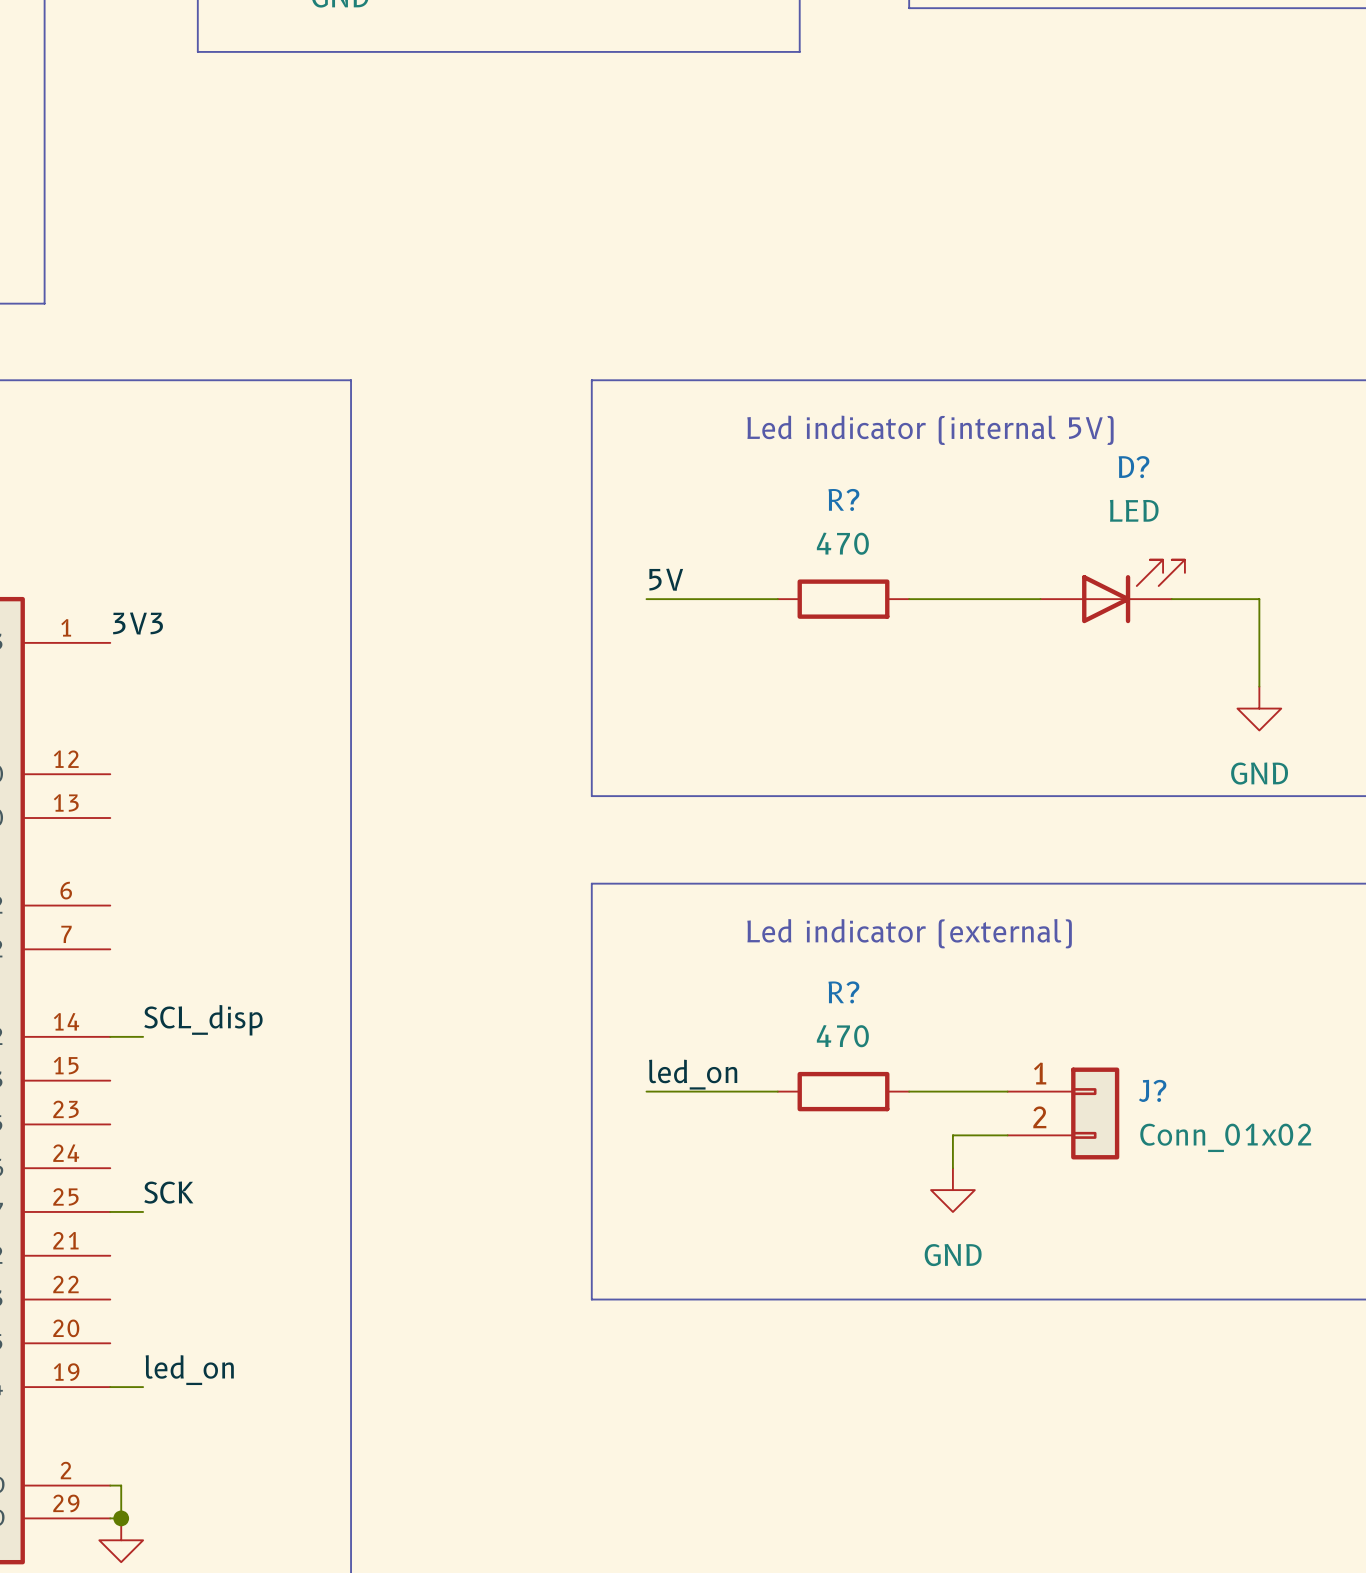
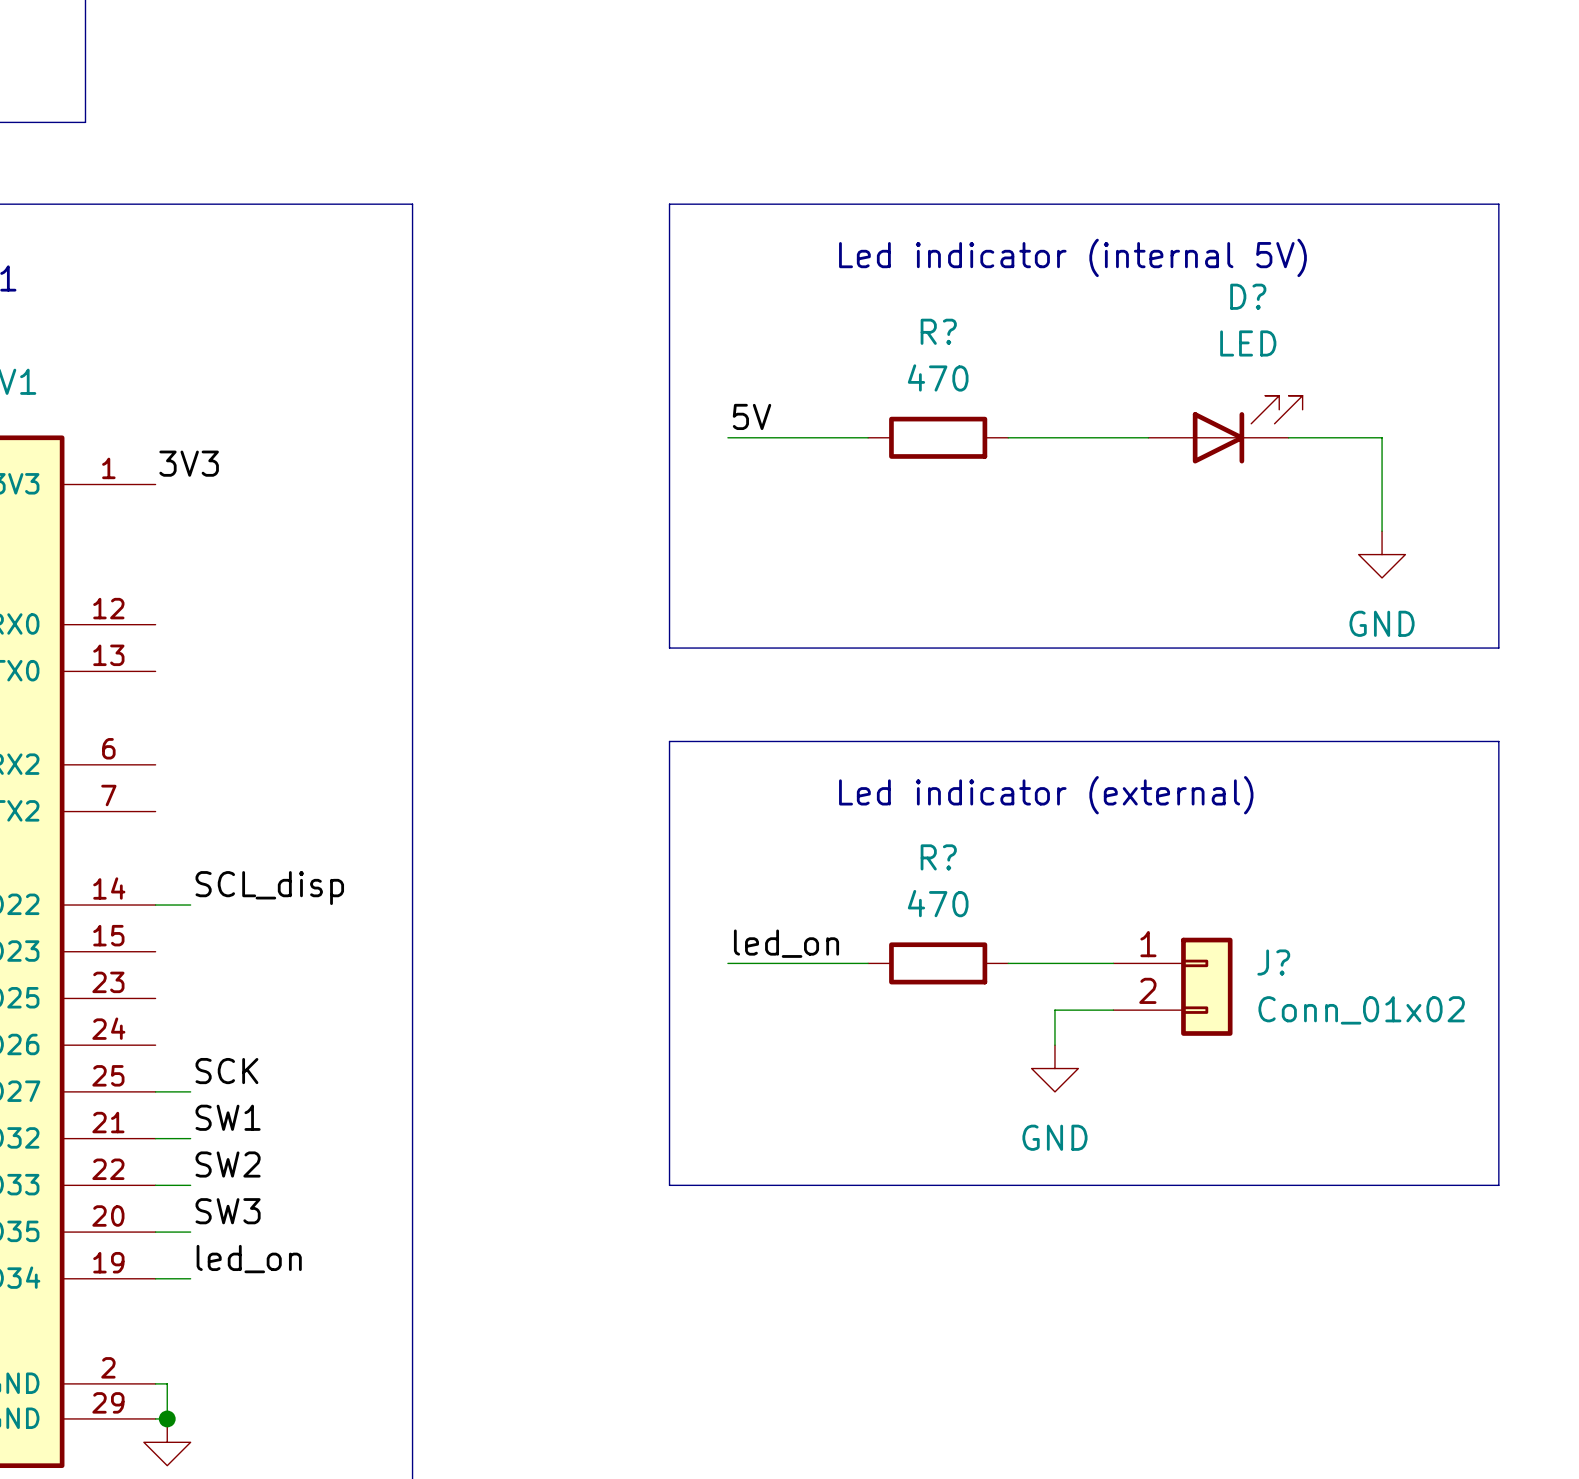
label: none -> SW1 (228, 1117)
wire: none -> (155, 1138) (190, 1138)
label: none -> SW2 (228, 1164)
wire: none -> (155, 1185) (190, 1185)
label: none -> SW3 (228, 1211)
wire: none -> (155, 1232) (190, 1232)

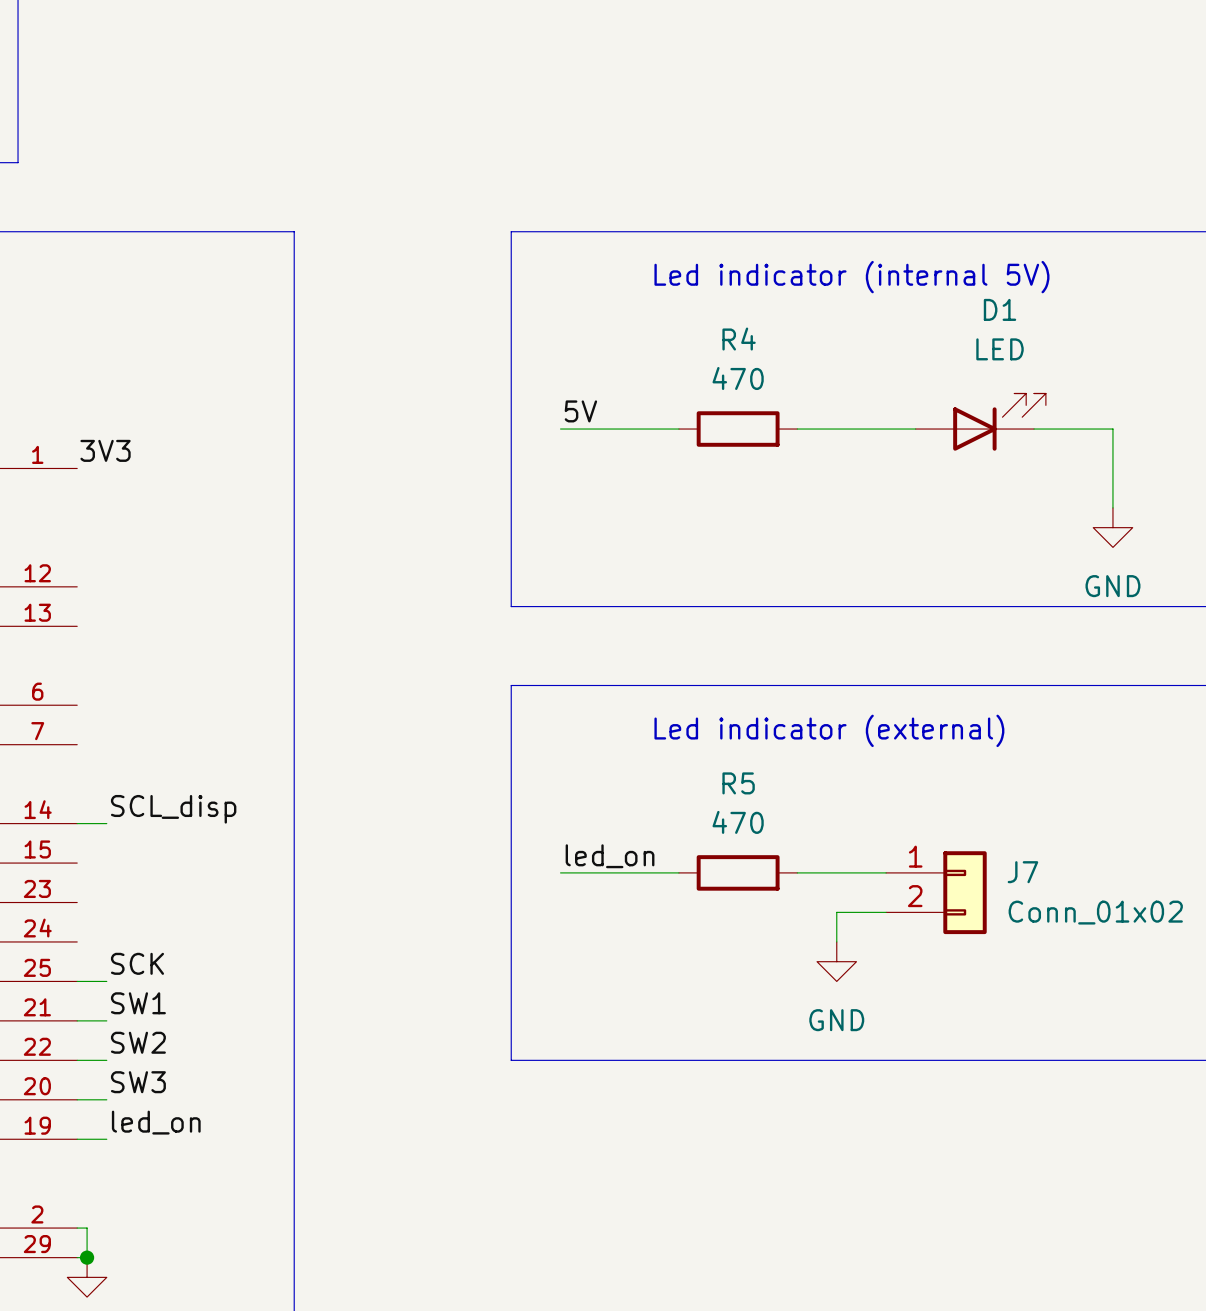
D? name: D? (1248, 296) -> D1 (1000, 309)
R? name: R? (938, 331) -> R4 (739, 339)
R? name: R? (938, 857) -> R5 (738, 783)
J? name: J? (1273, 962) -> J7 (1022, 872)

